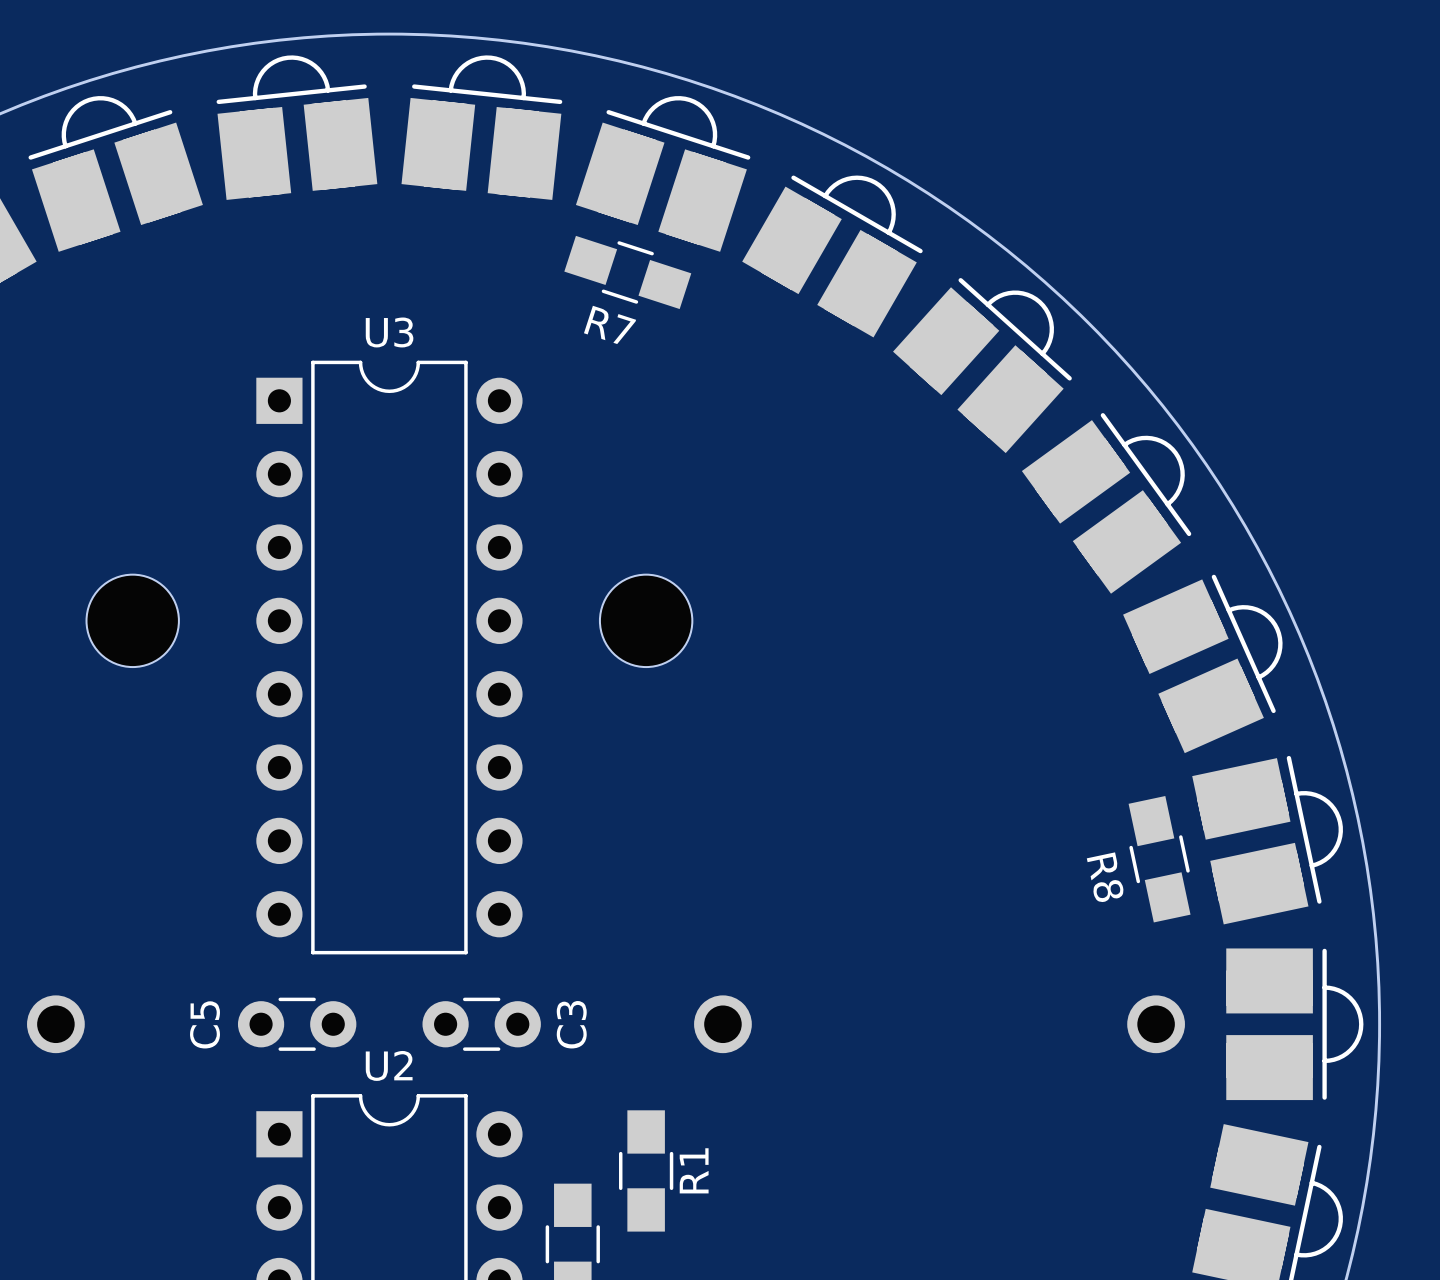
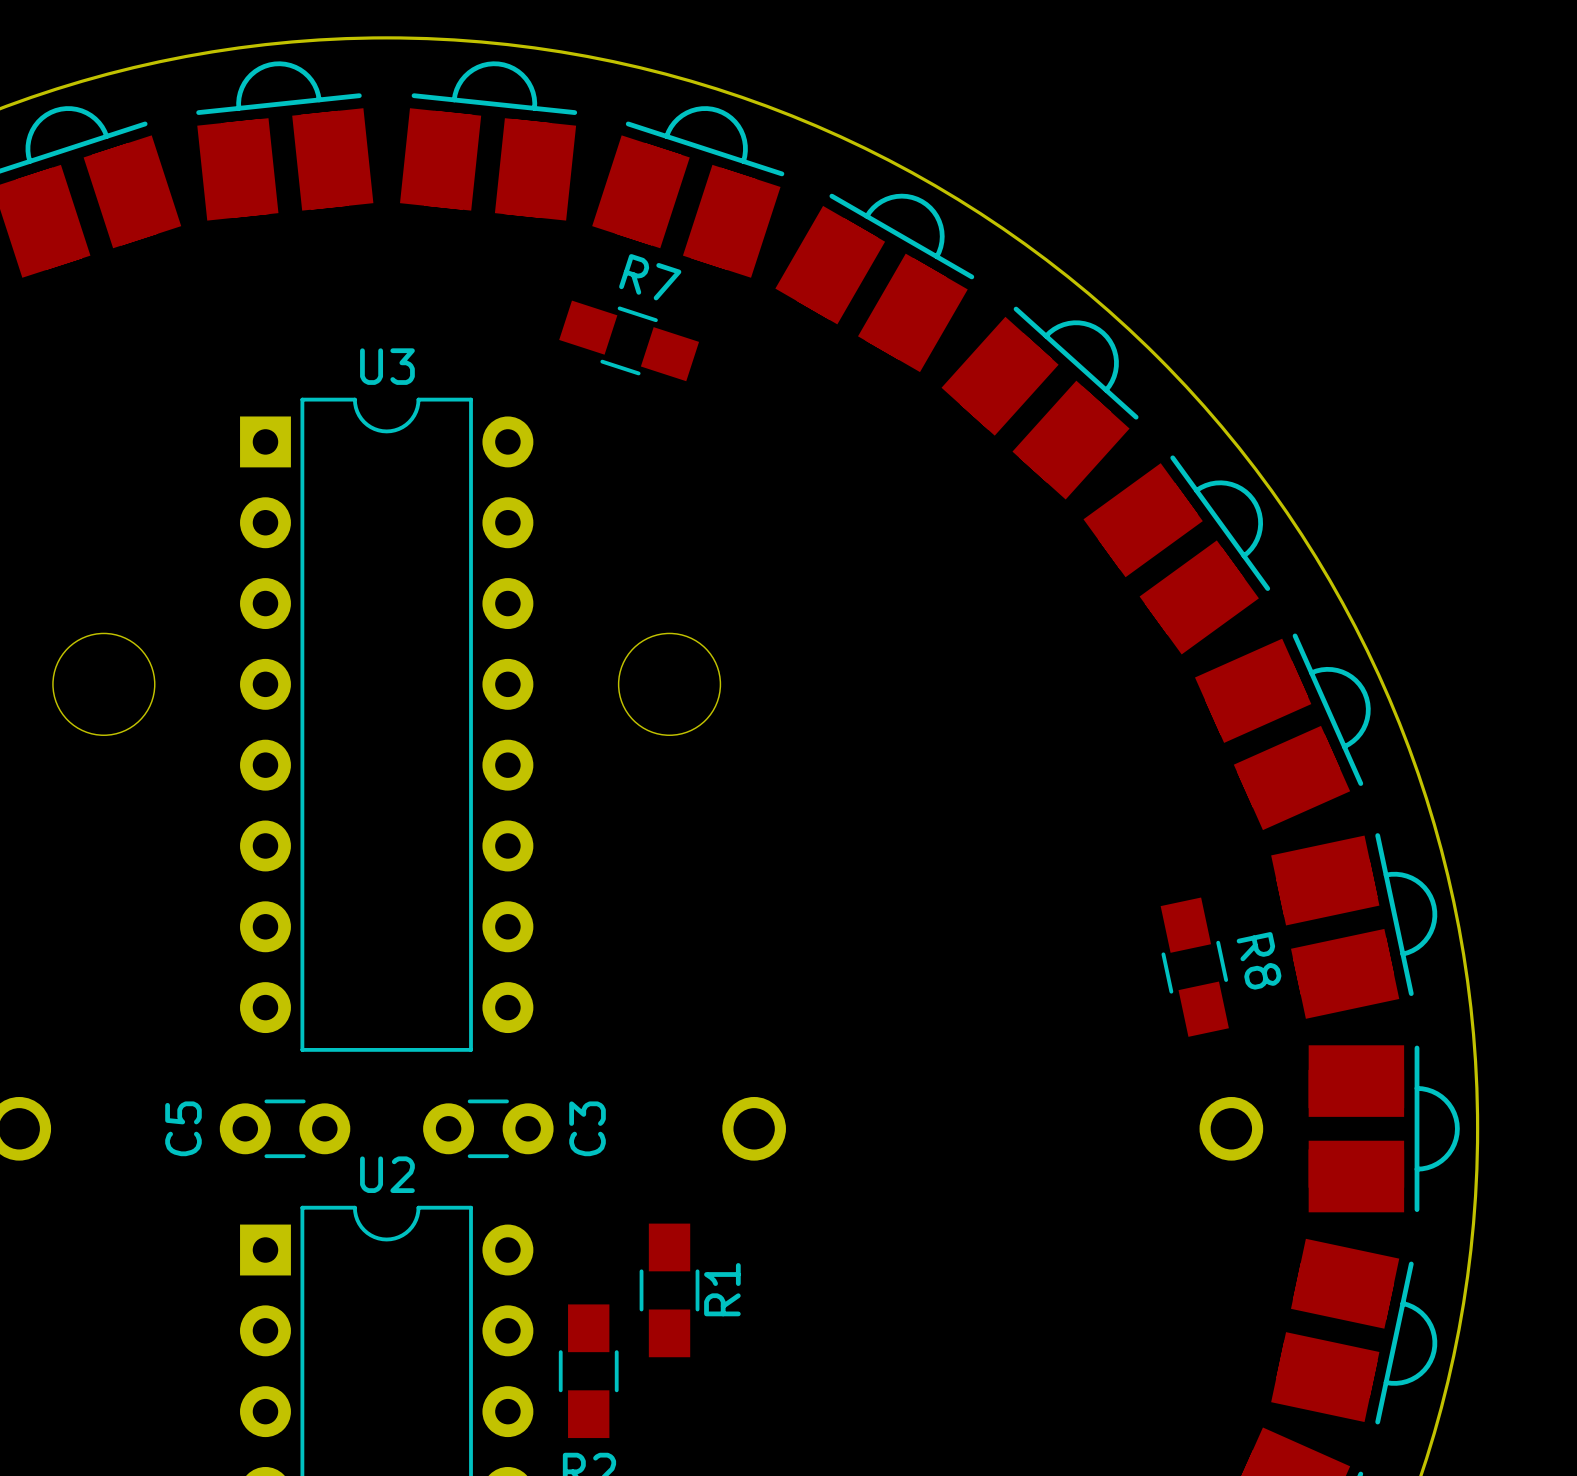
R7 position: (627, 272) -> (629, 340)
R7 name position: R7 (610, 324) -> R7 (650, 277)
R8 position: (1159, 859) -> (1194, 967)
R8 name position: R8 (1105, 877) -> R8 (1259, 960)

